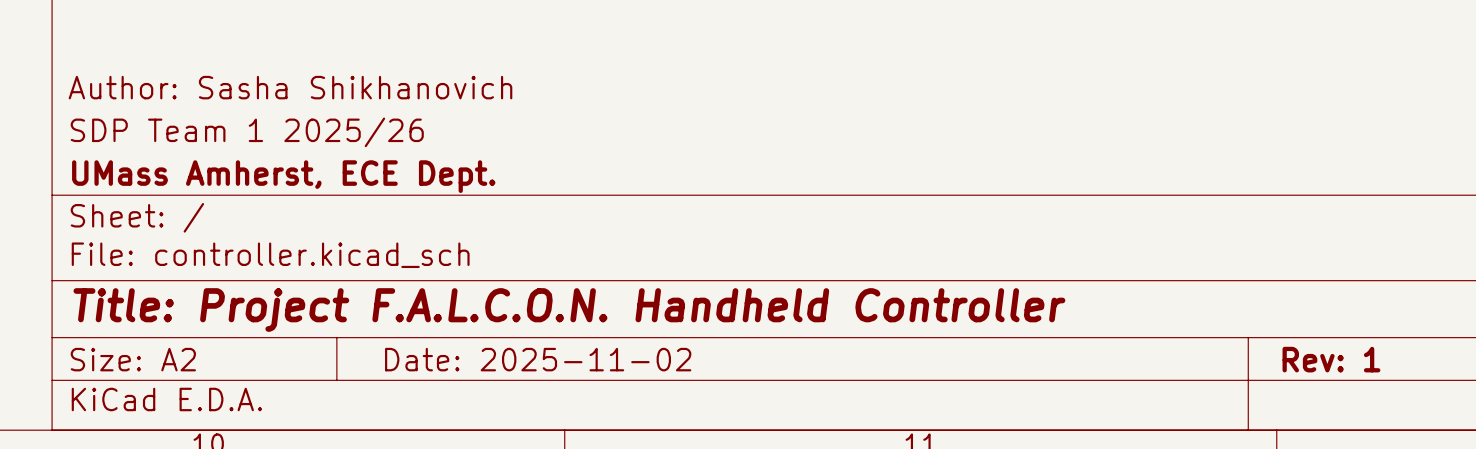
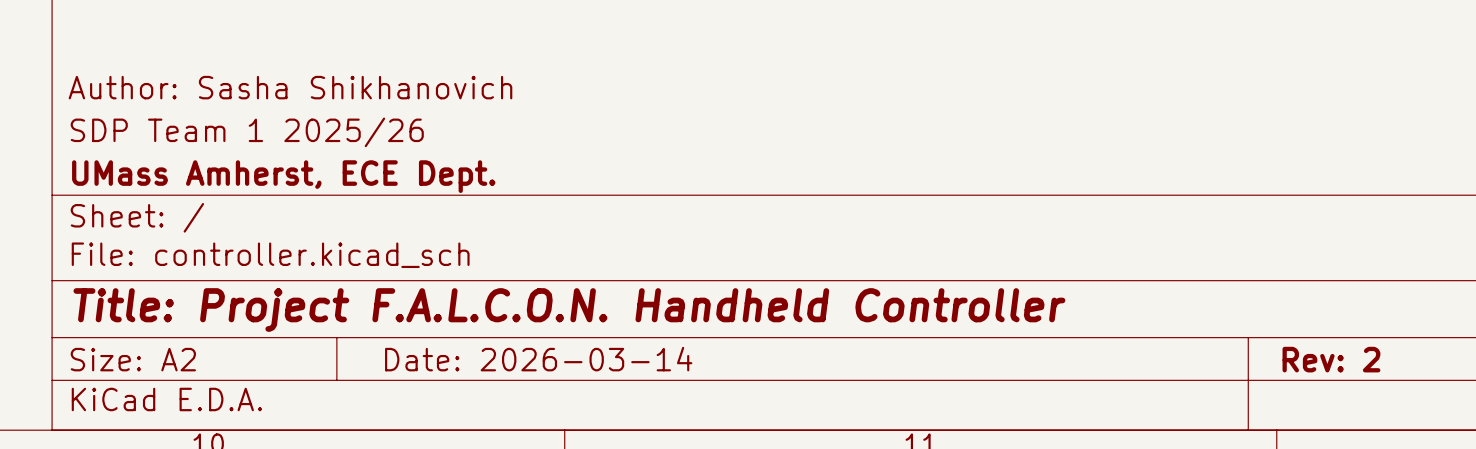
title block: Date: 2025-11-02 (538, 359) -> Date: 2026-03-14 (538, 359)
title block: Rev: 1 (1331, 359) -> Rev: 2 (1331, 359)

